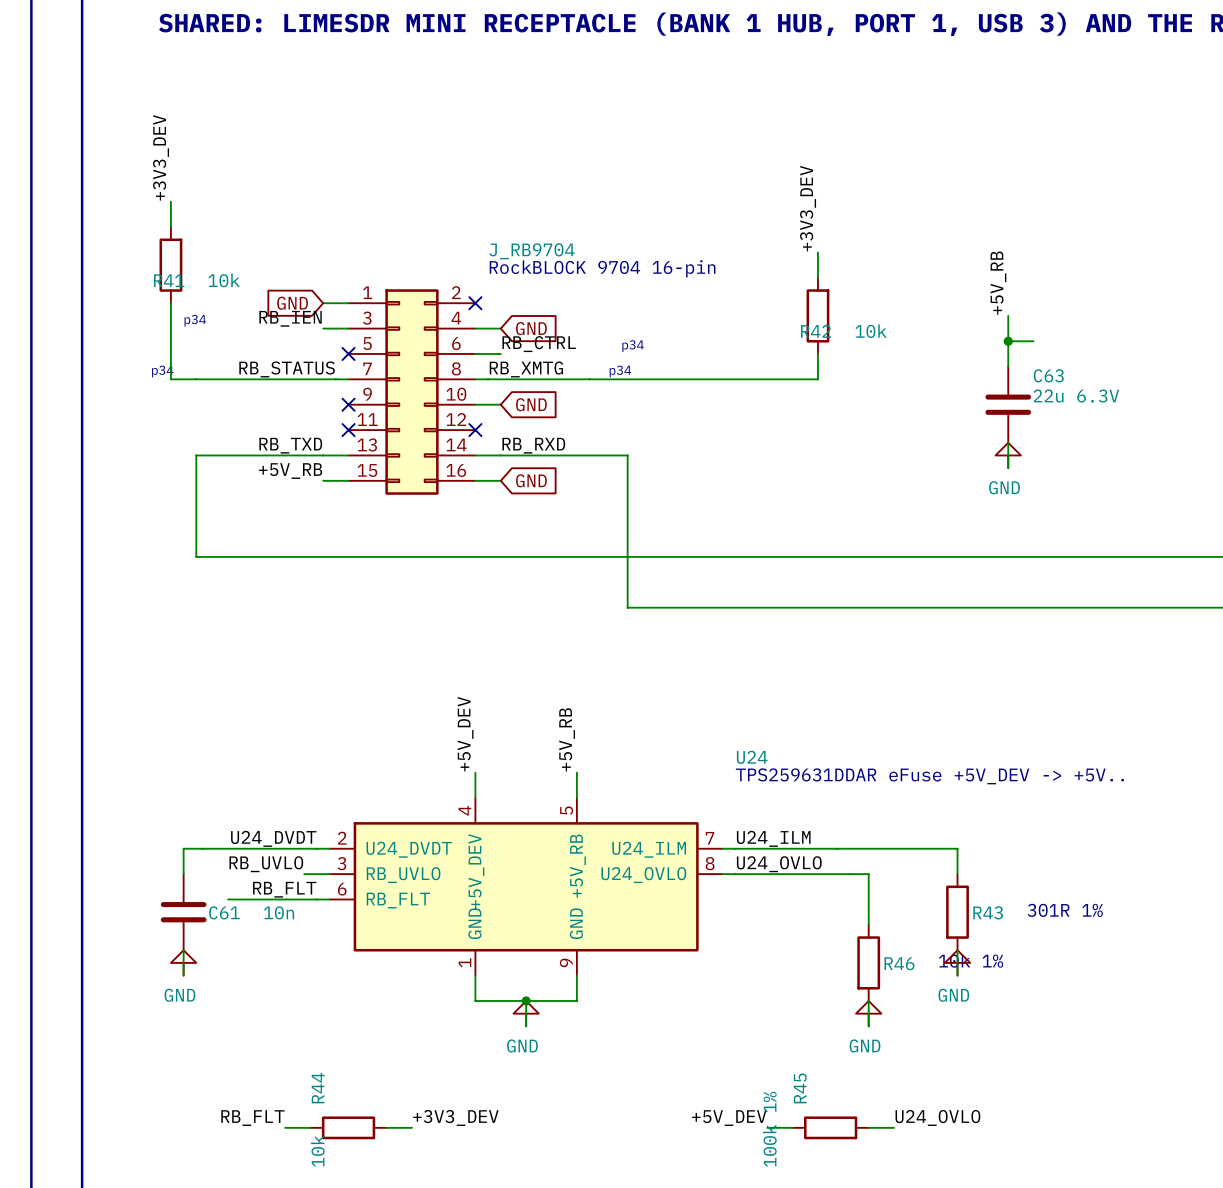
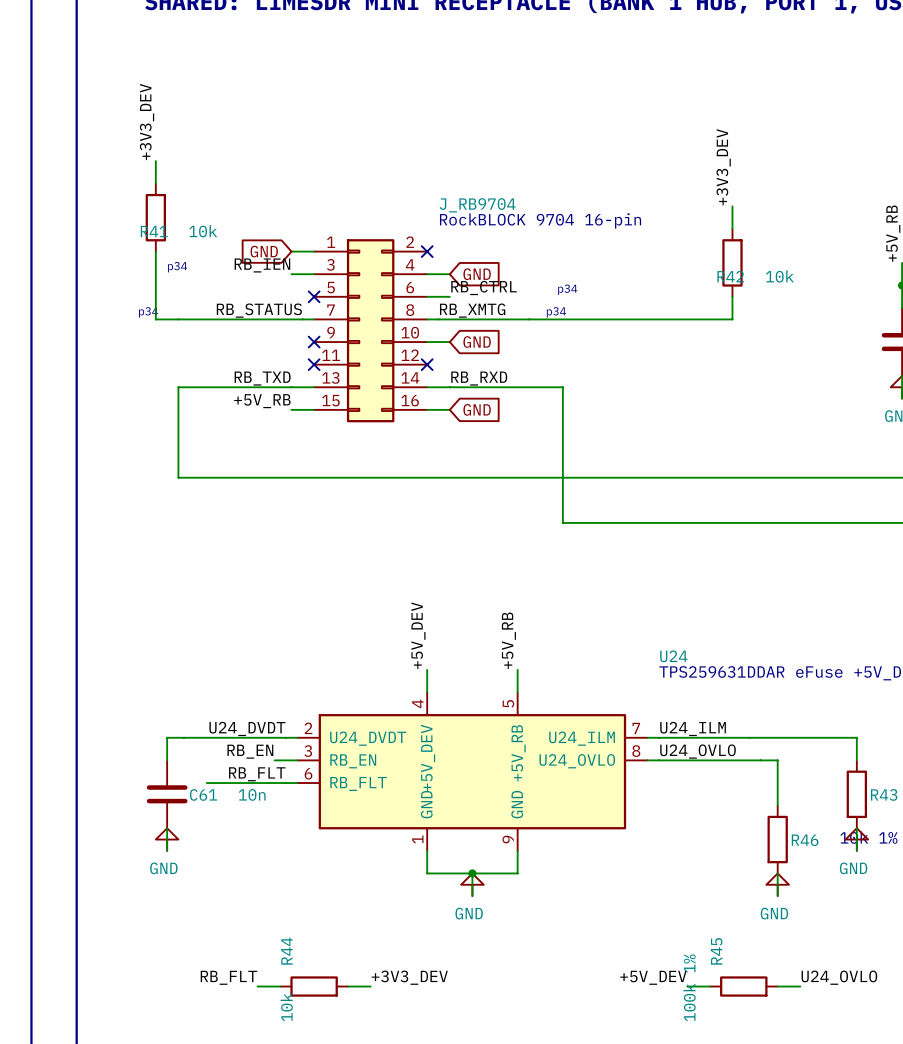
label: RB_UVLO (266, 864) -> RB_EN (250, 751)
U24 pin name: RB_UVLO (403, 875) -> RB_EN (353, 761)

